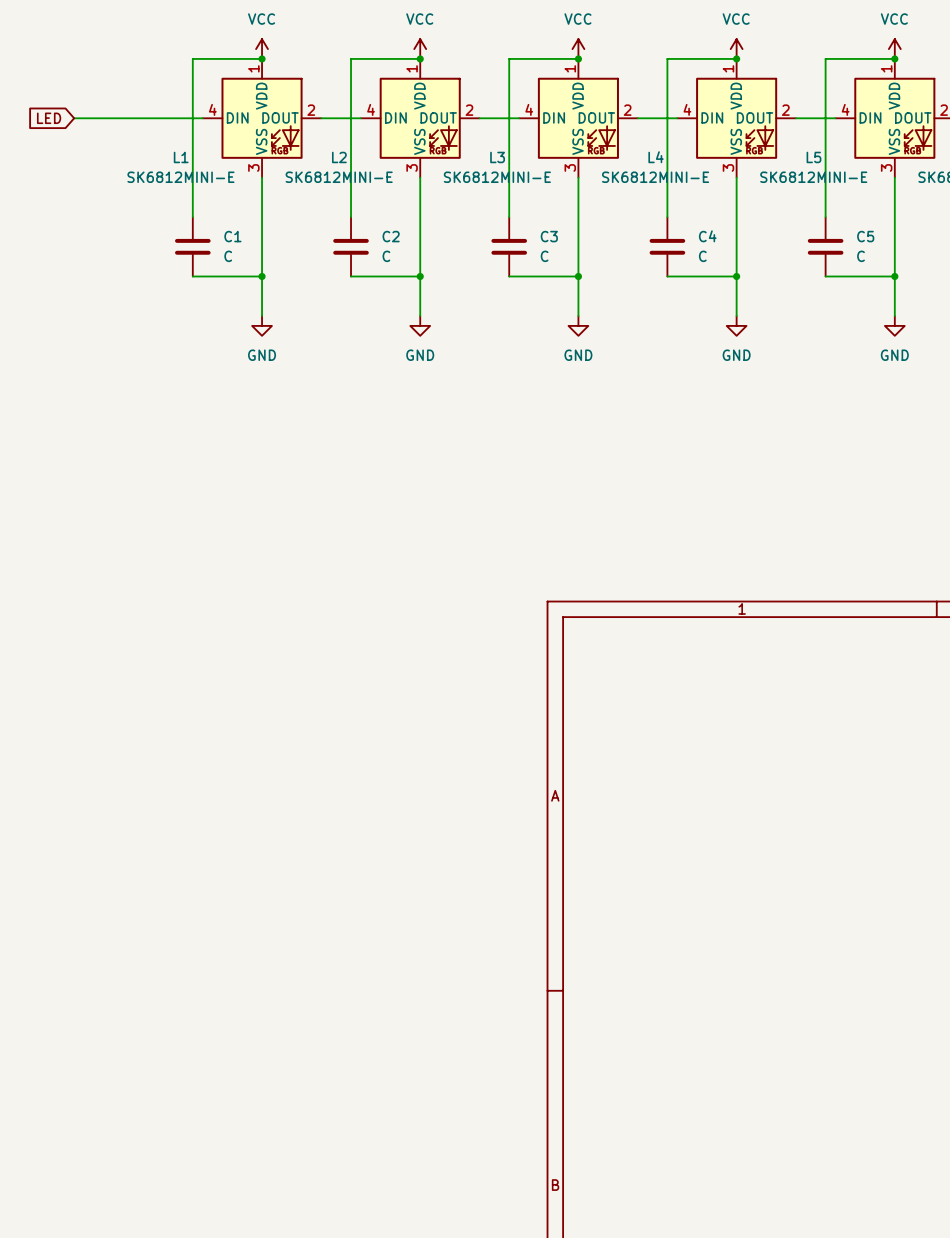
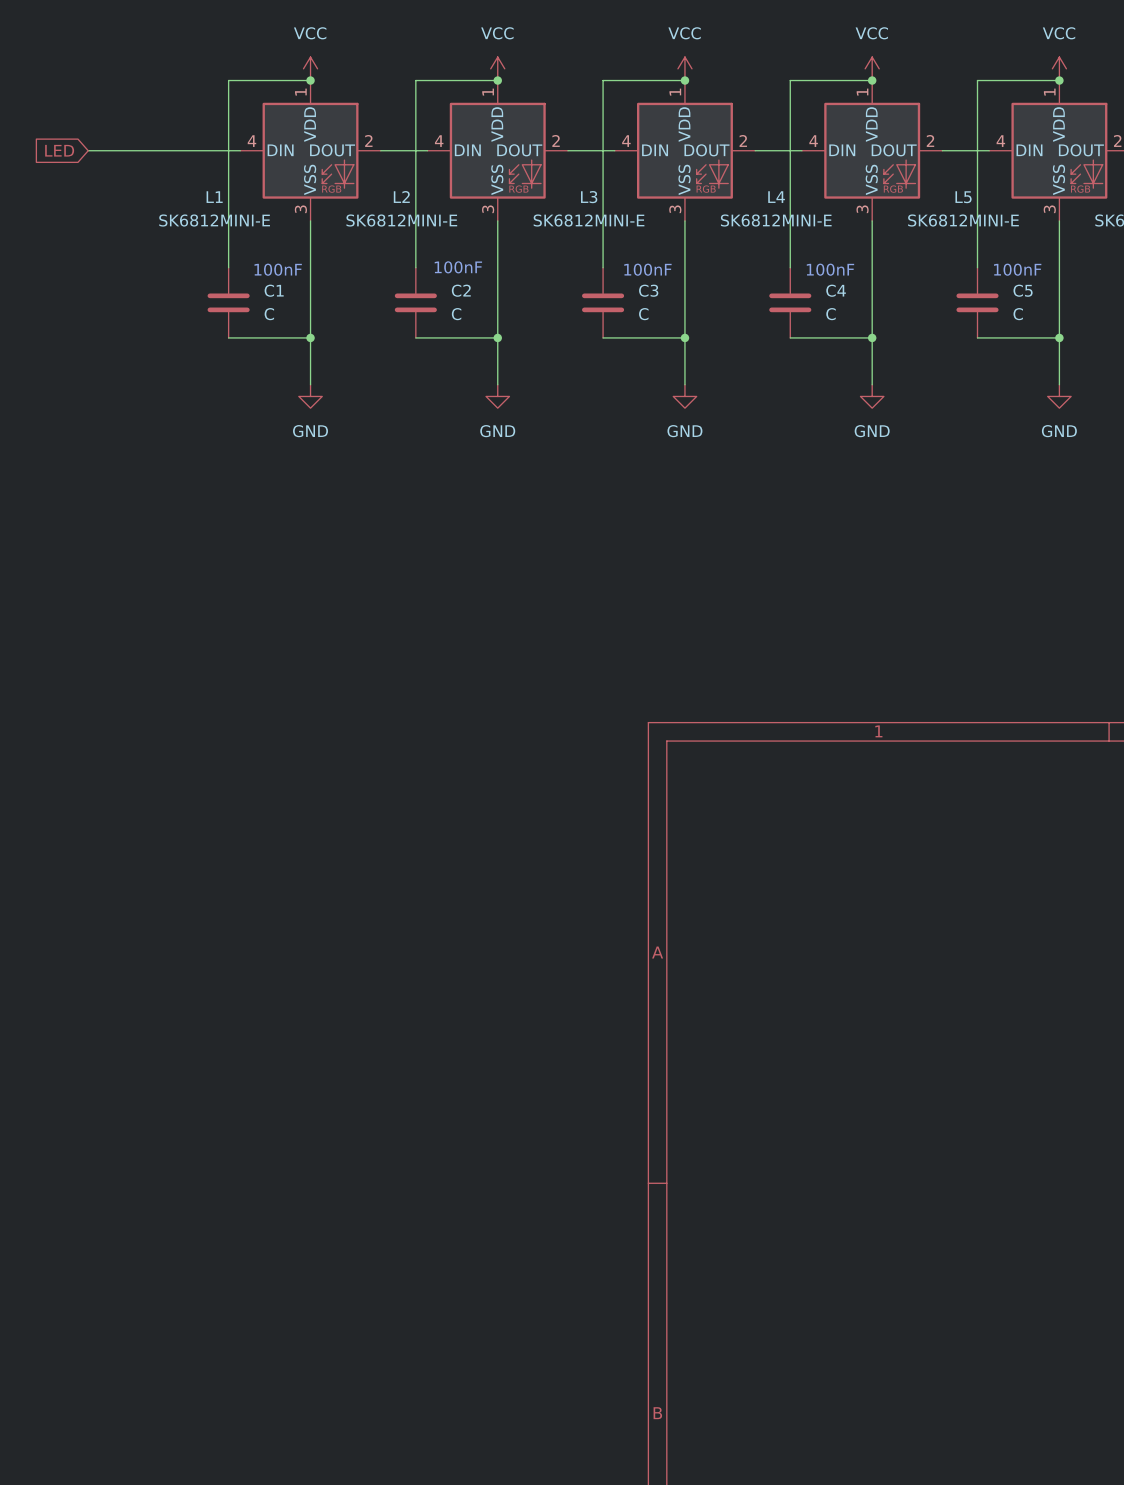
text: none -> 100nF (458, 267)
text: none -> 100nF (278, 269)
text: none -> 100nF (647, 269)
text: none -> 100nF (830, 269)
text: none -> 100nF (1017, 269)

